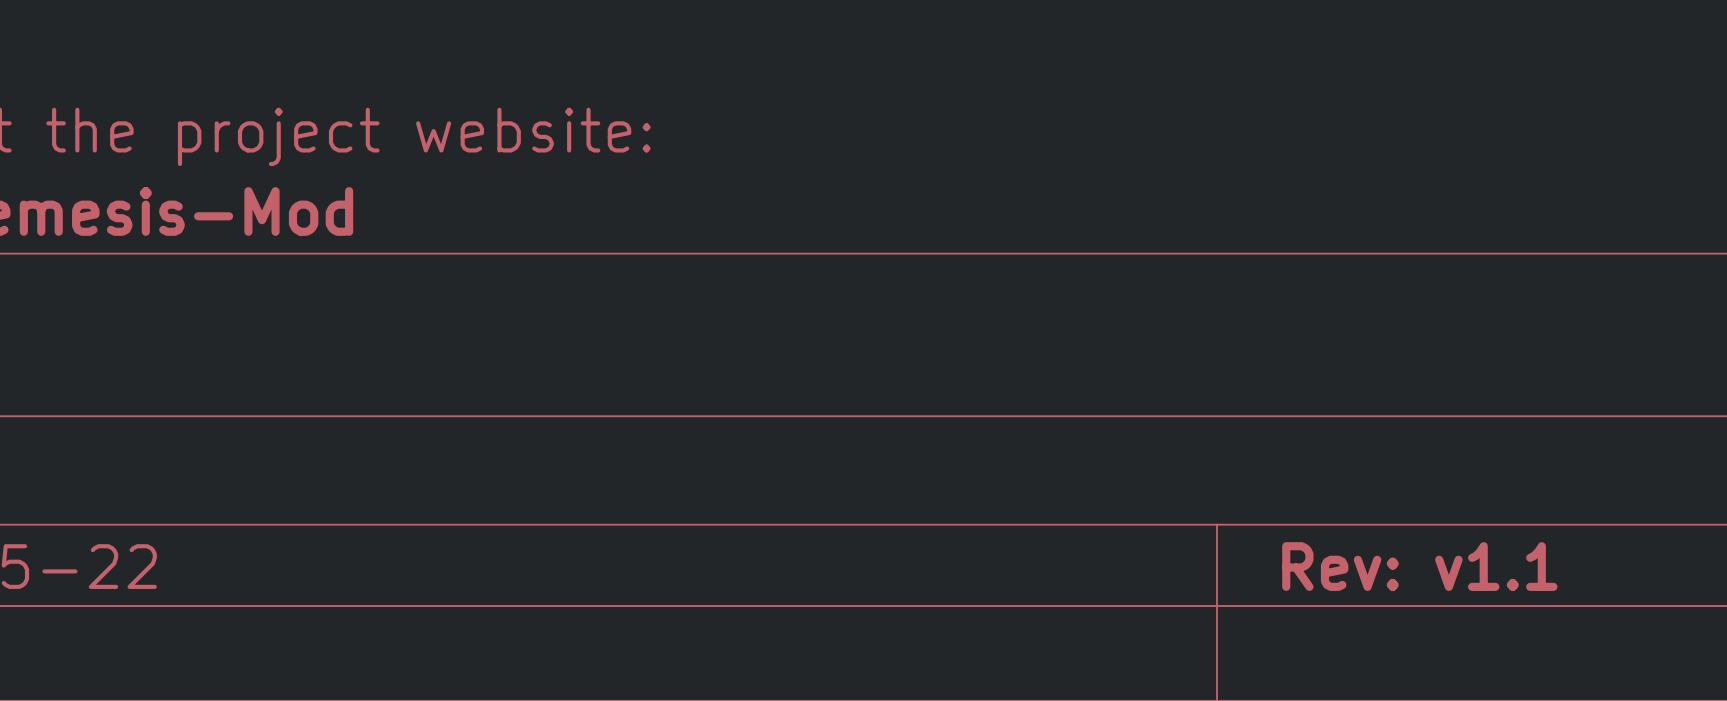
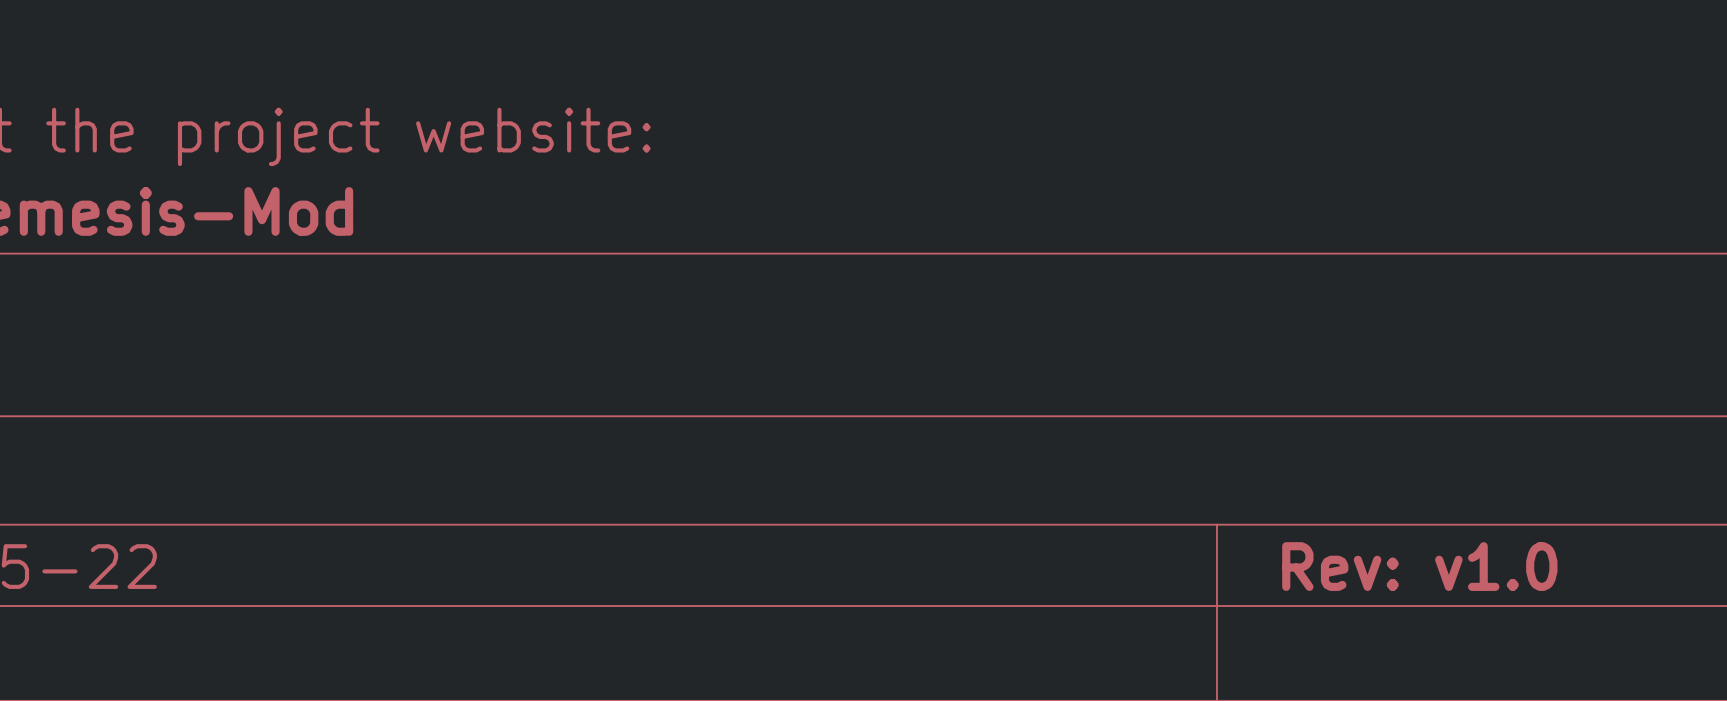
title block: Rev: v1.1 (1419, 566) -> Rev: v1.0 (1419, 566)

